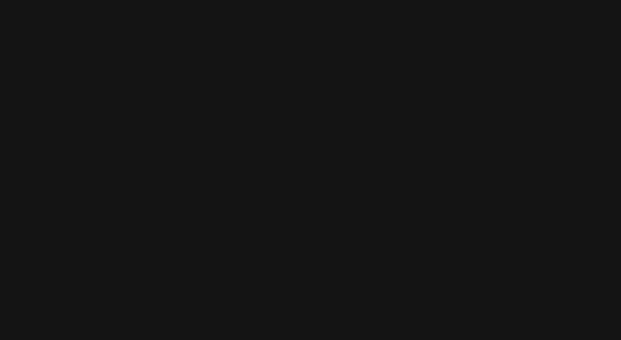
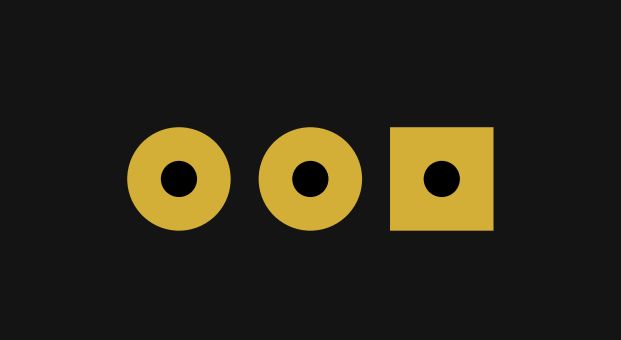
part: none -> (310, 178)

